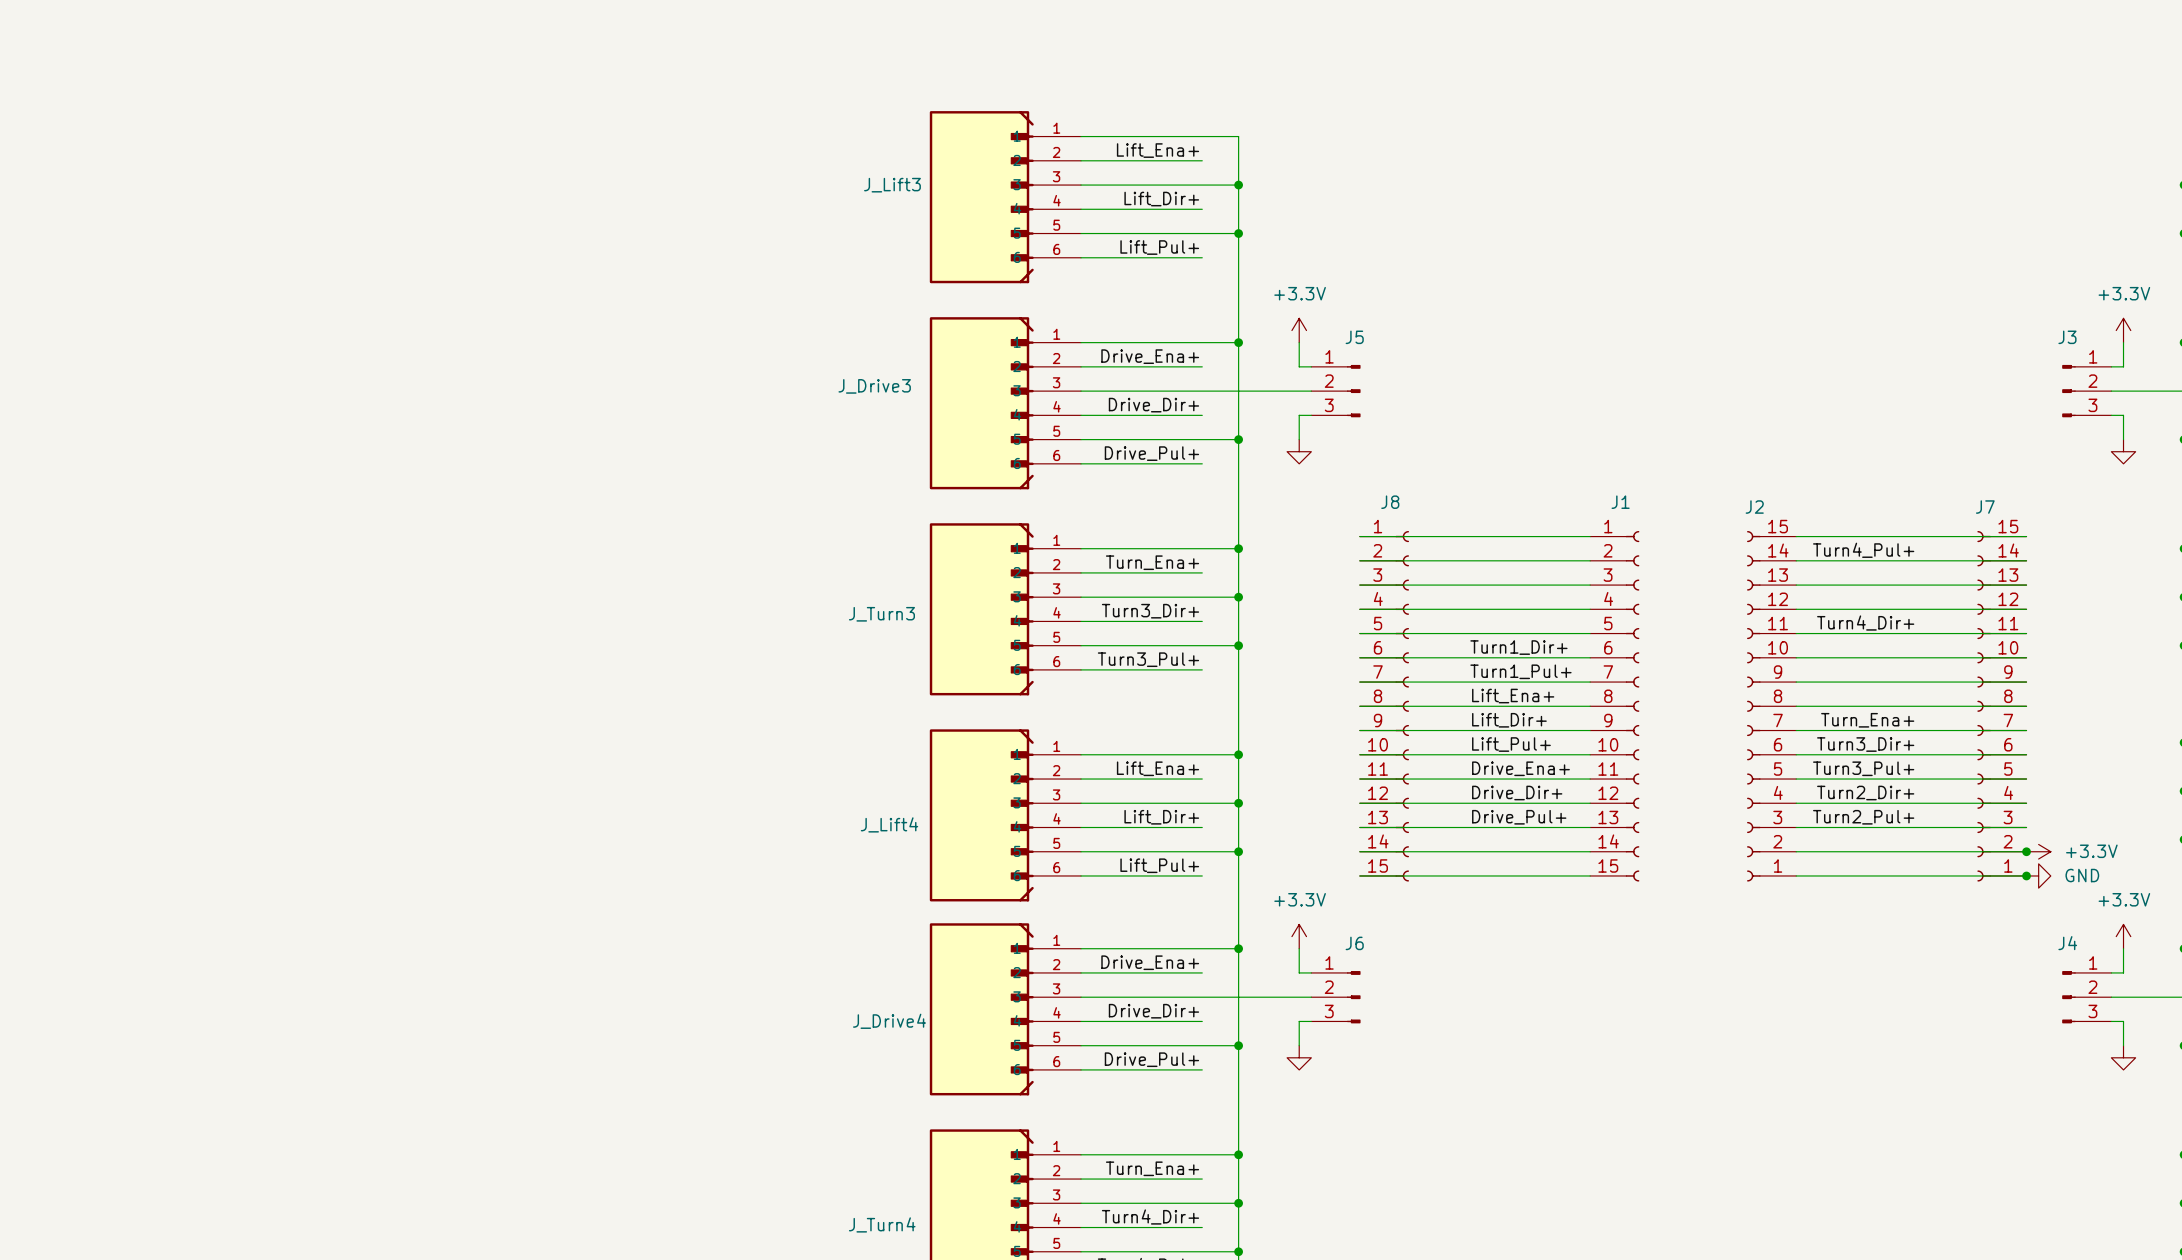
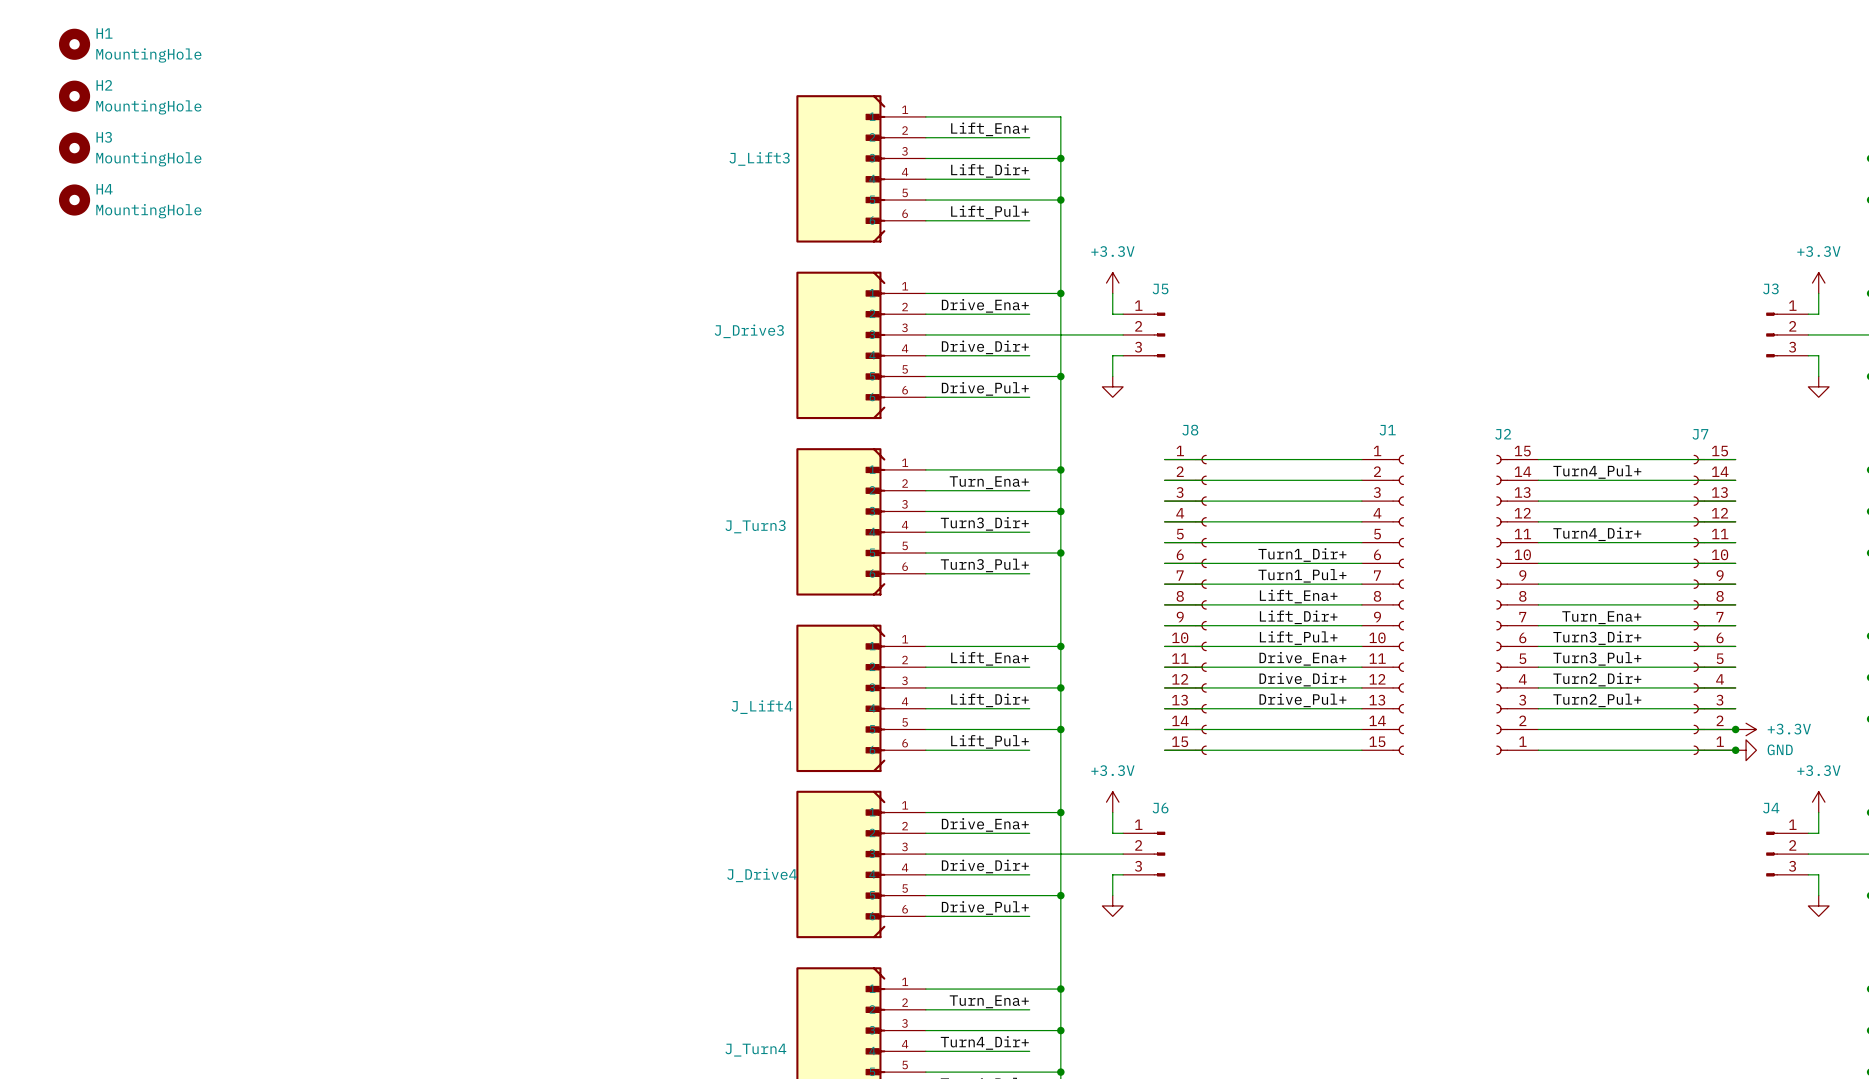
H1: none -> MountingHole (74, 44)
H2: none -> MountingHole (74, 96)
H3: none -> MountingHole (74, 148)
H4: none -> MountingHole (74, 200)

